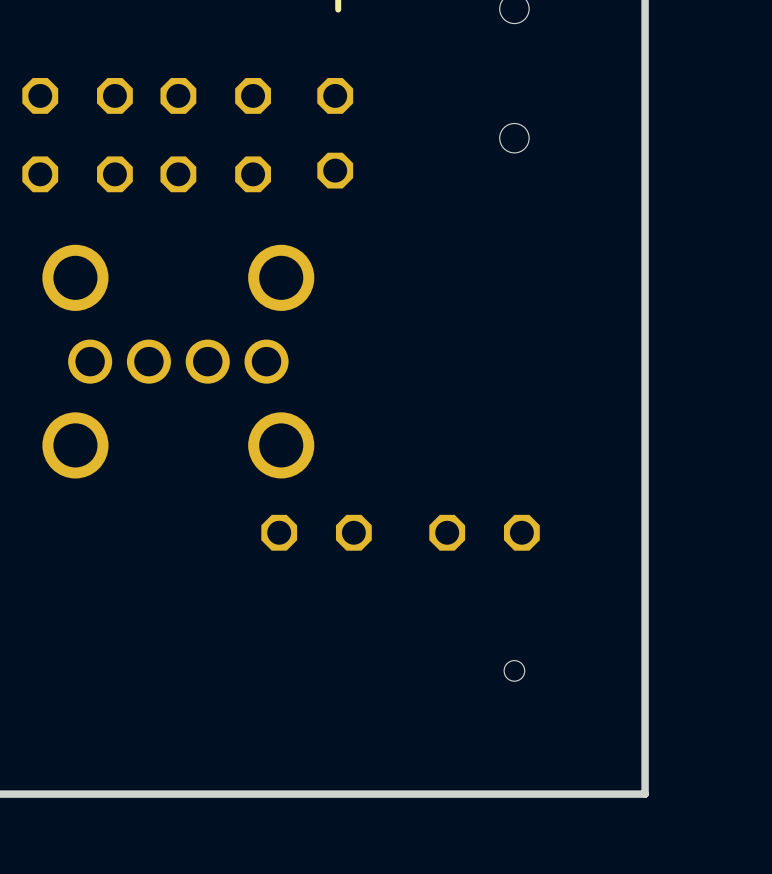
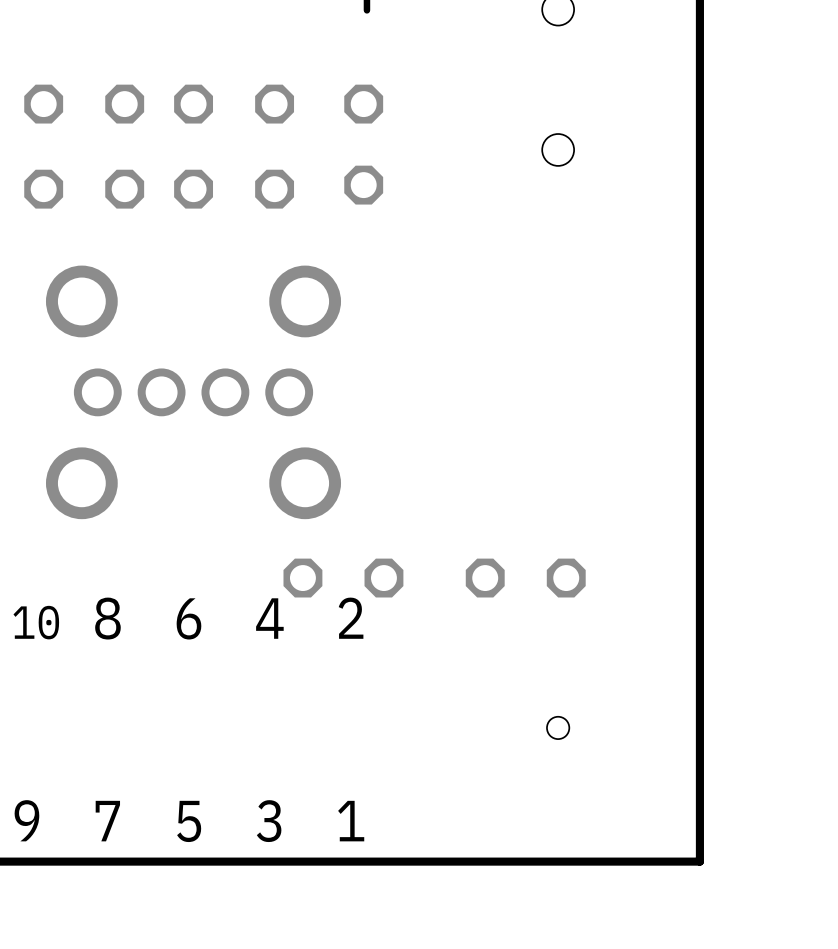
text: none -> 2 (351, 618)
text: none -> 8 (107, 618)
text: none -> 6 (188, 618)
text: none -> 4 (269, 618)
text: none -> 10 (36, 622)
text: none -> 9 (26, 820)
text: none -> 7 (107, 821)
text: none -> 5 (189, 821)
text: none -> 3 (269, 821)
text: none -> 1 (351, 821)

